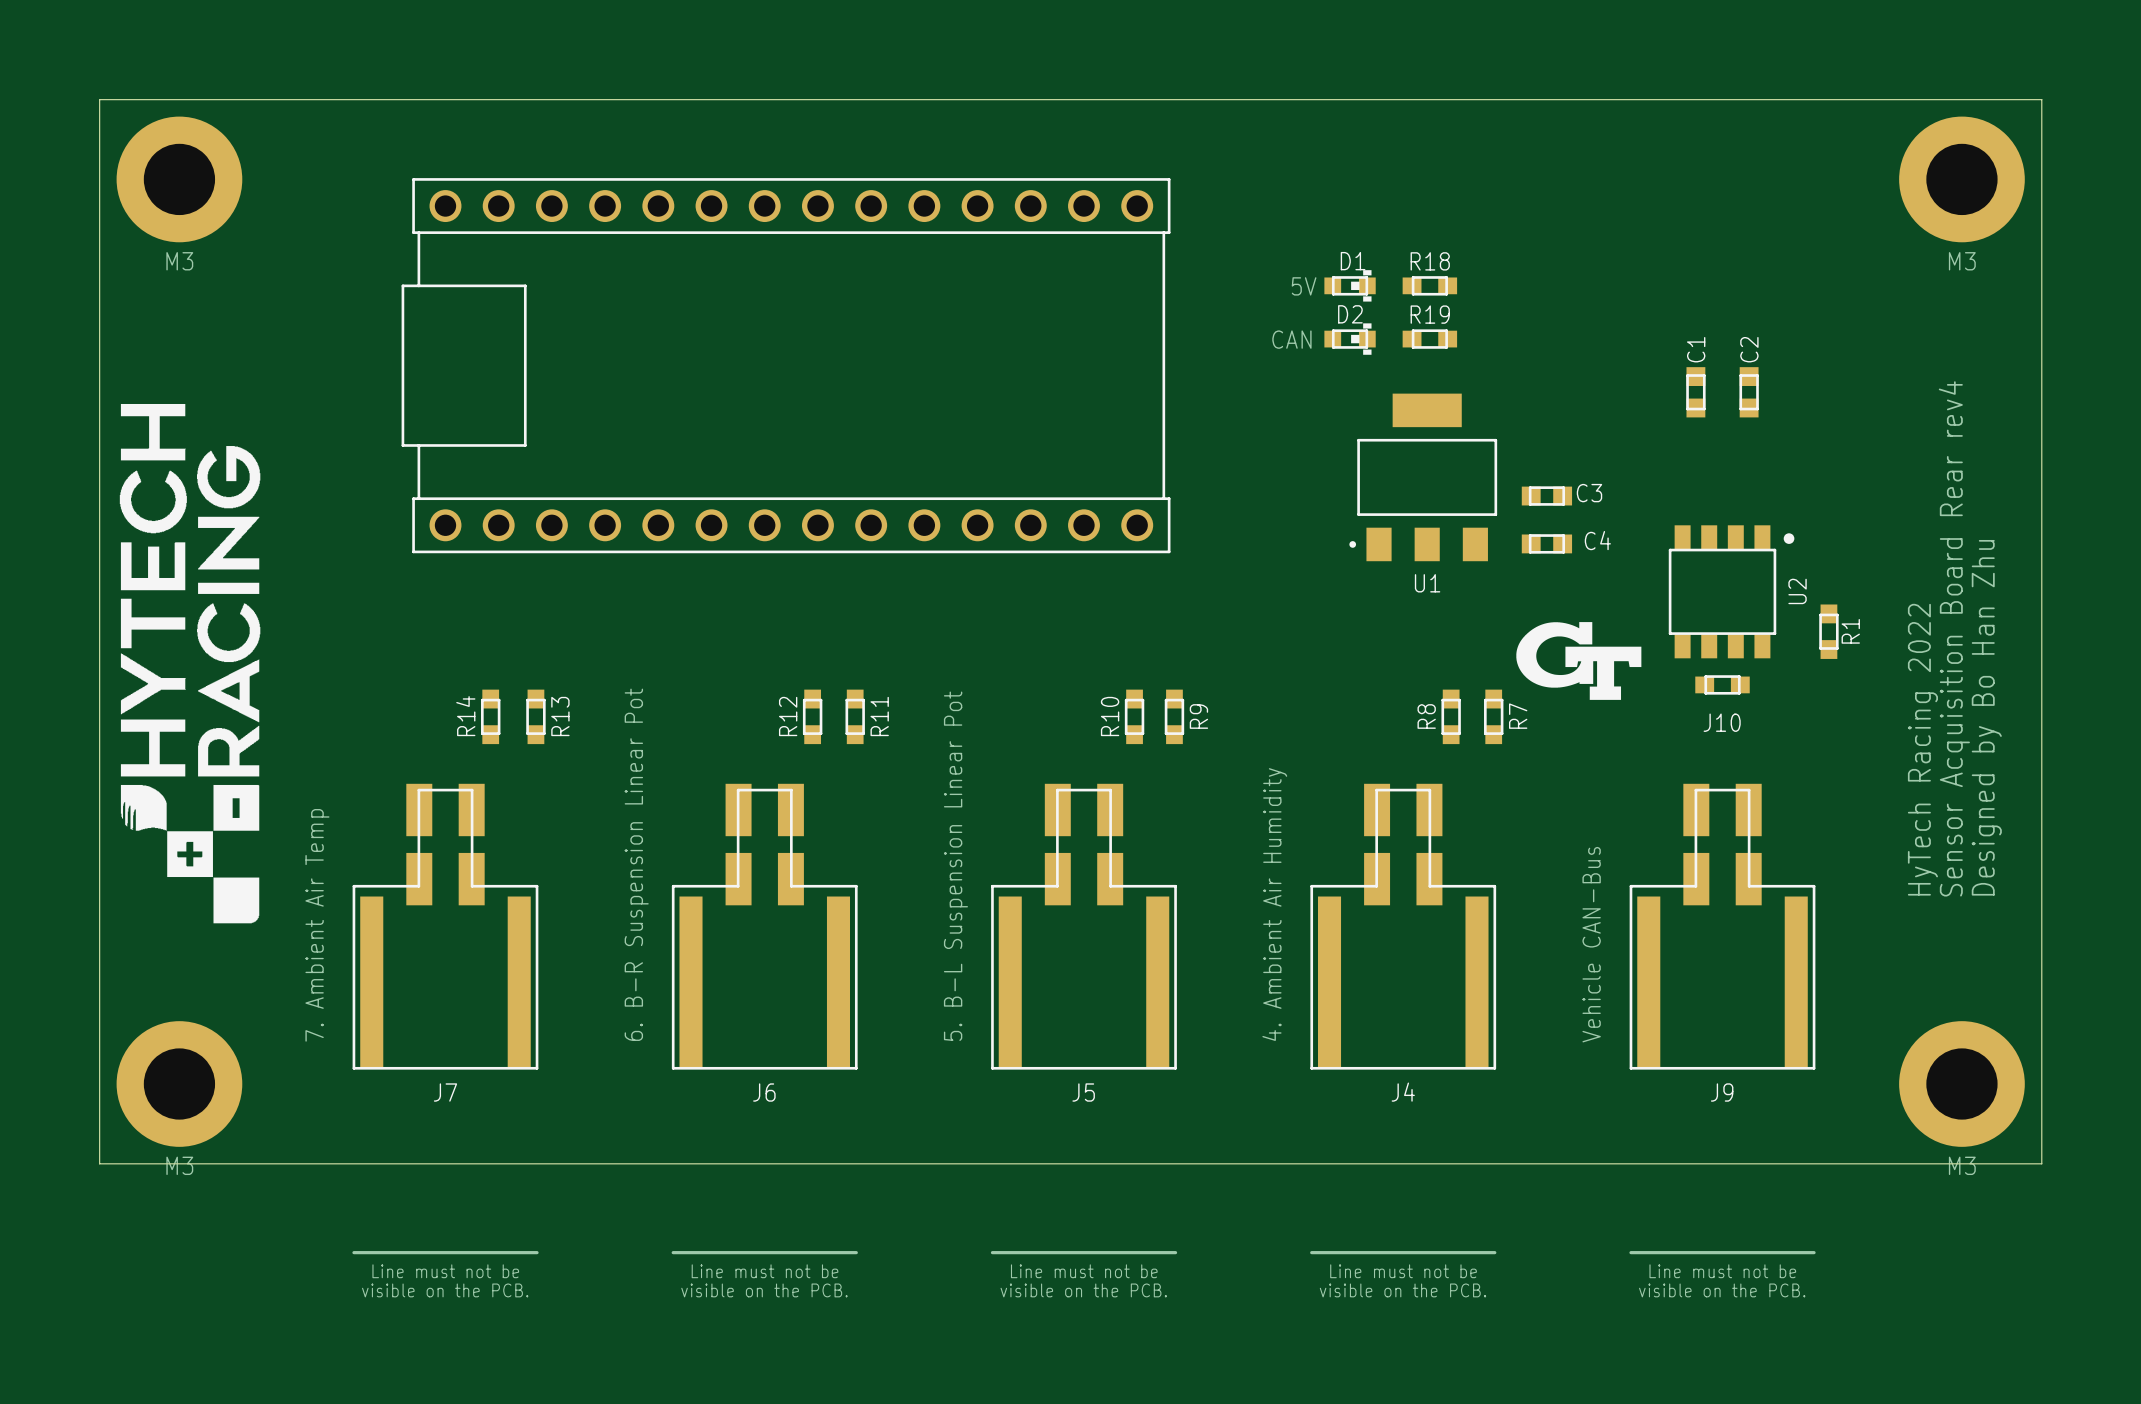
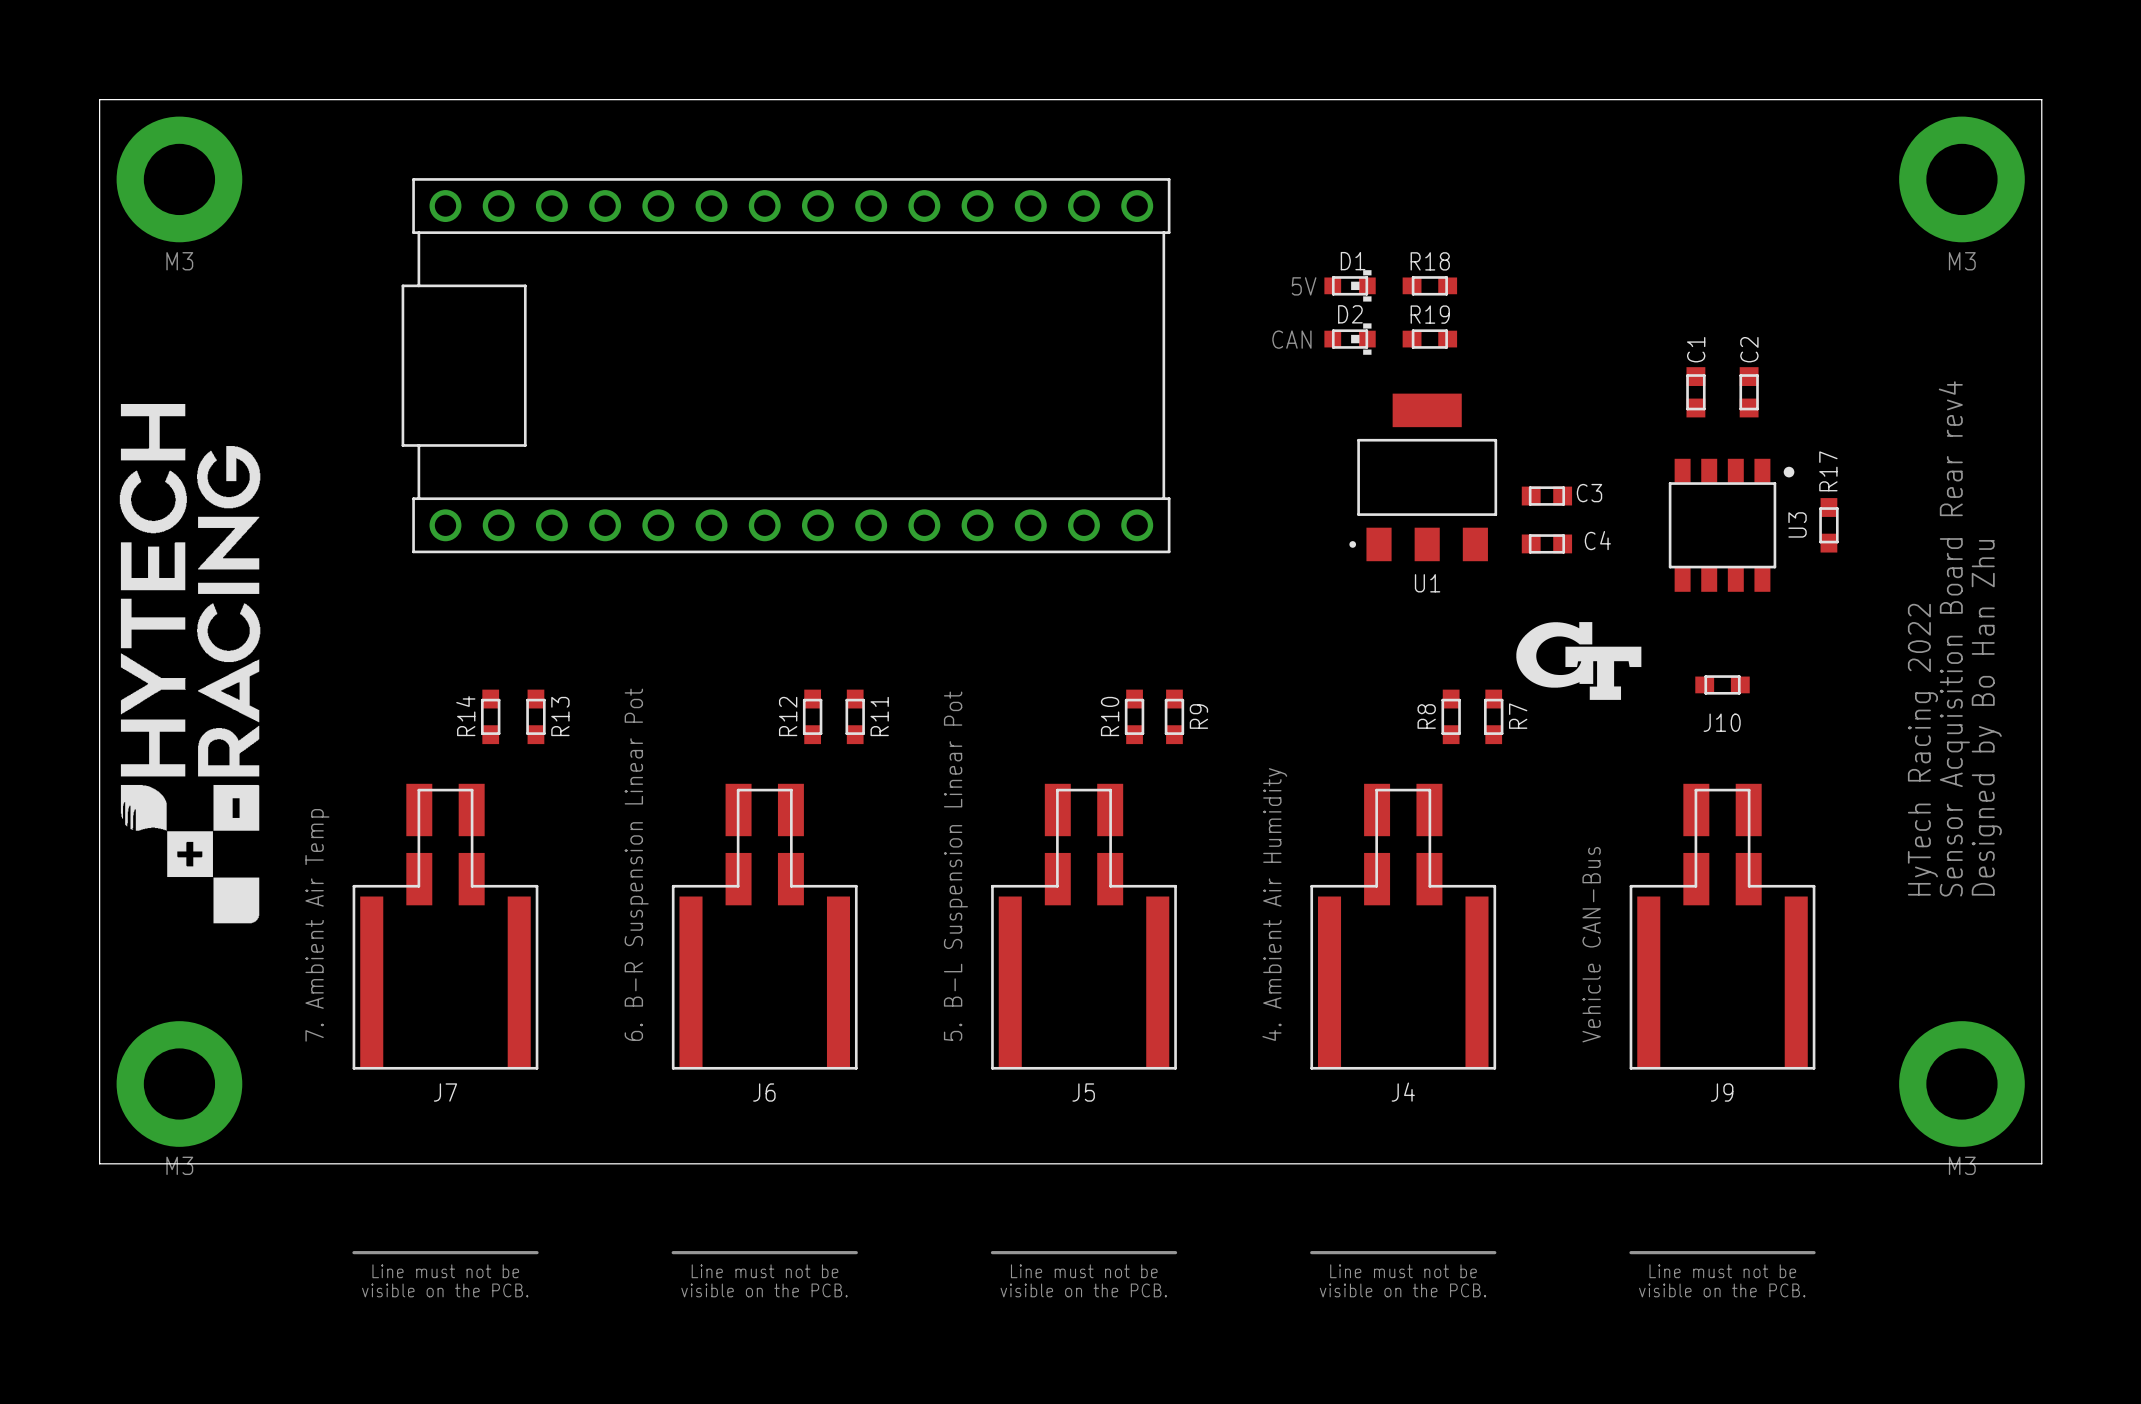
U3: none -> (1731, 525)
R17: none -> (1828, 525)
U2: (1731, 591) -> none
R1: (1828, 631) -> none

